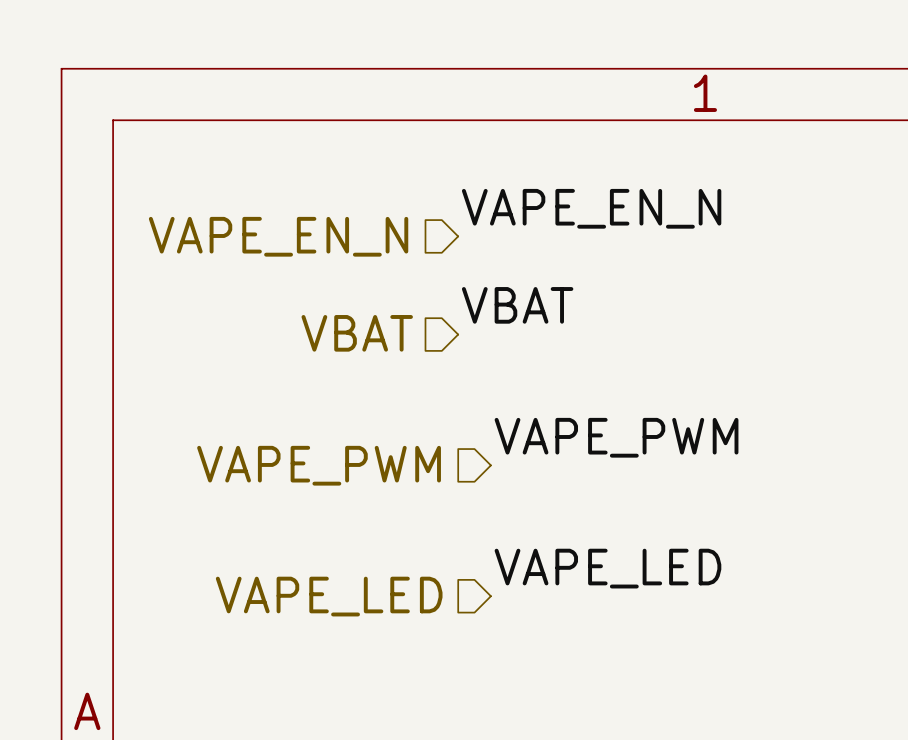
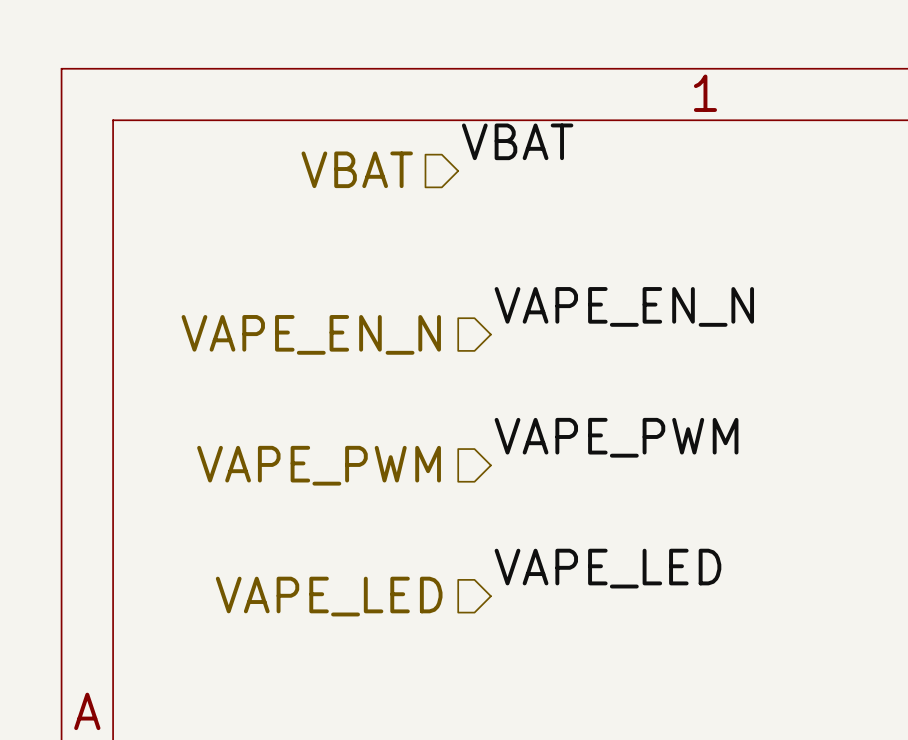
label position: VAPE_EN_N (591, 208) -> VAPE_EN_N (624, 306)
hierarchical label position: VAPE_EN_N (278, 236) -> VAPE_EN_N (311, 334)
label position: VBAT (517, 305) -> VBAT (517, 141)
hierarchical label position: VBAT (357, 333) -> VBAT (357, 169)

